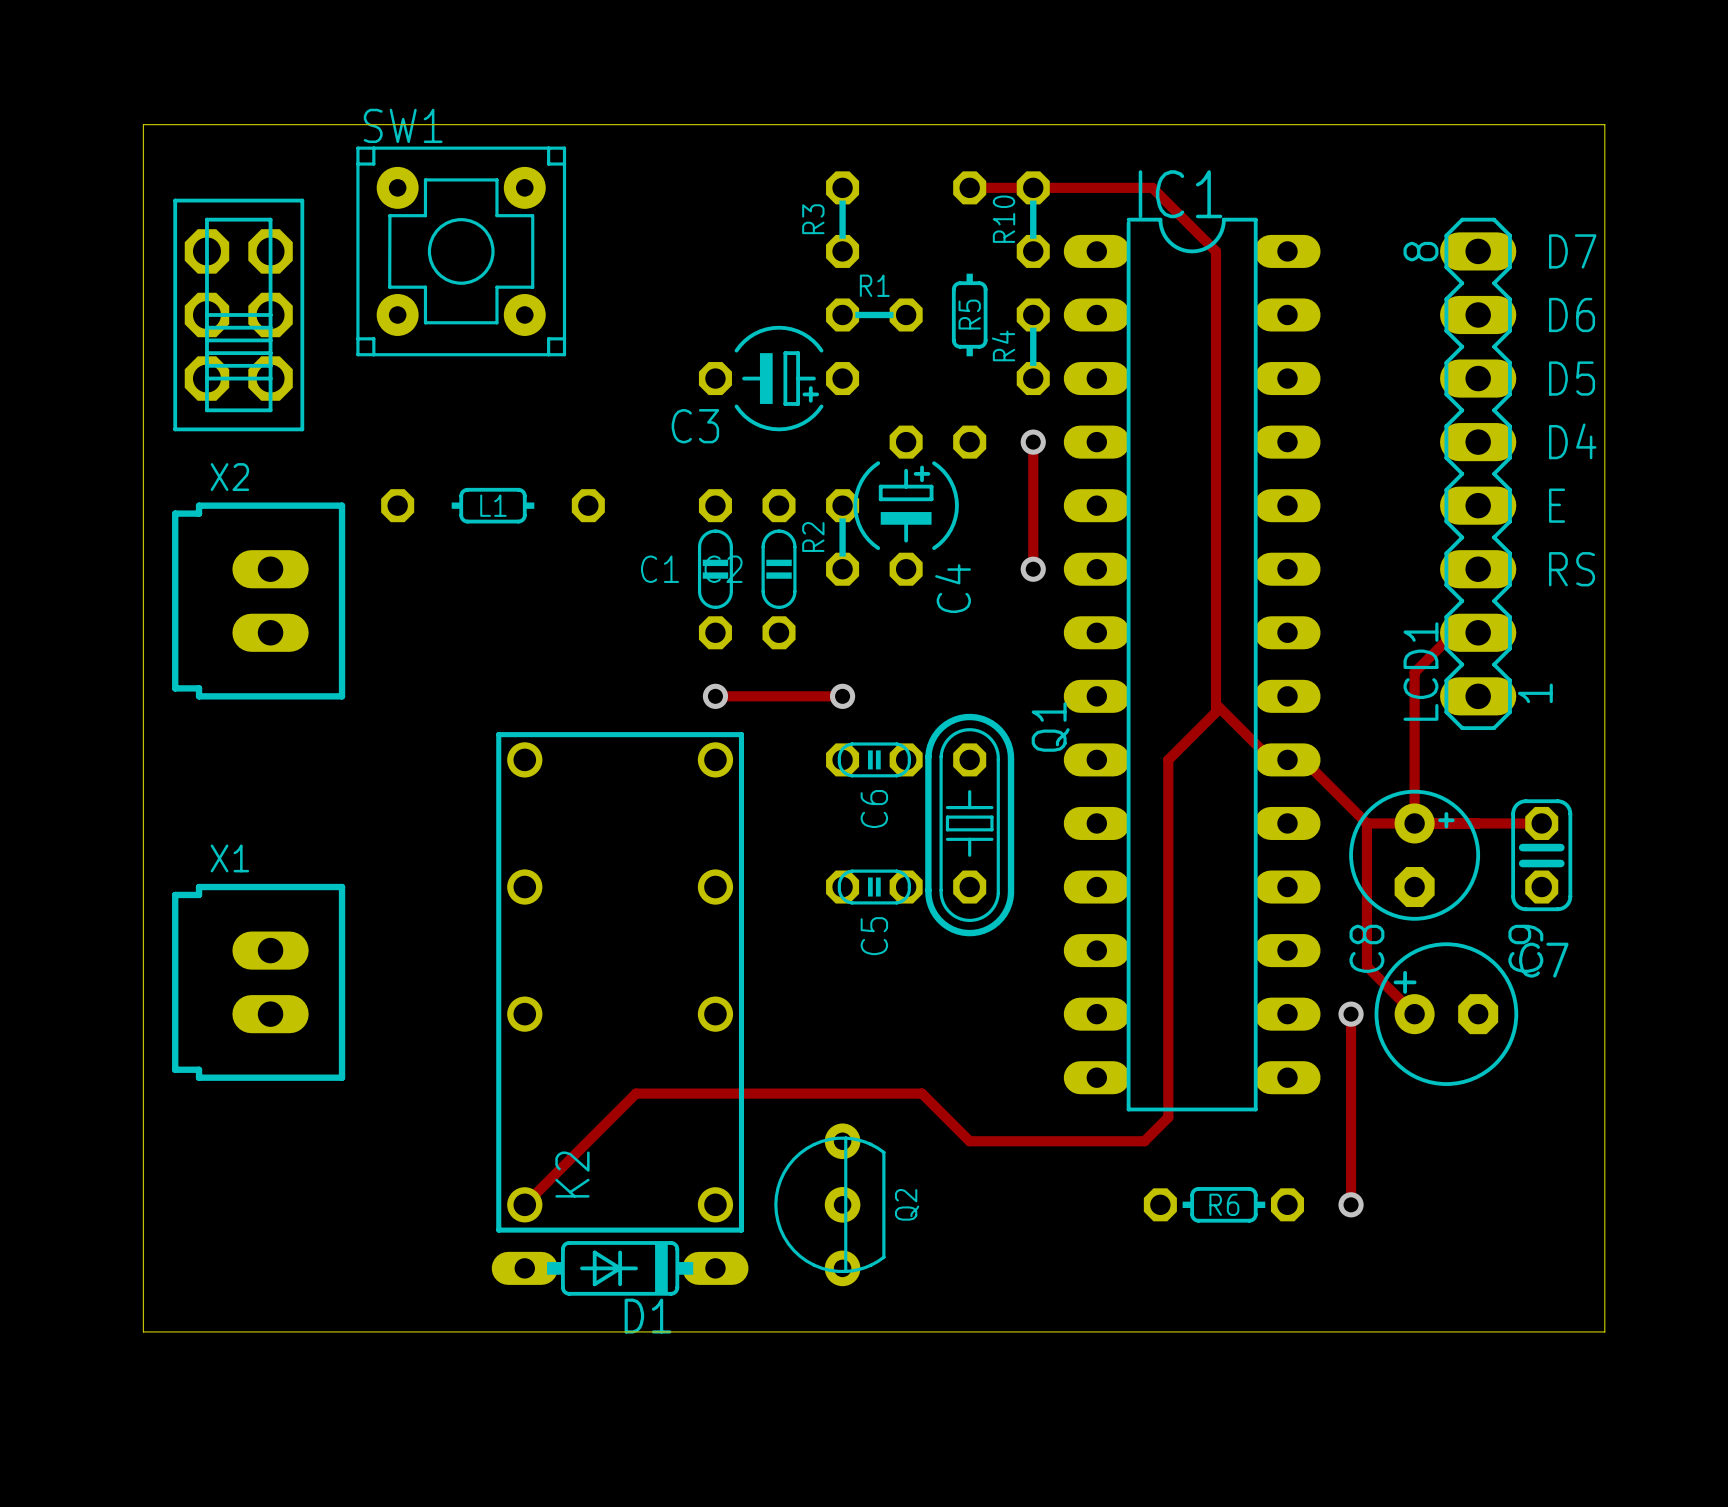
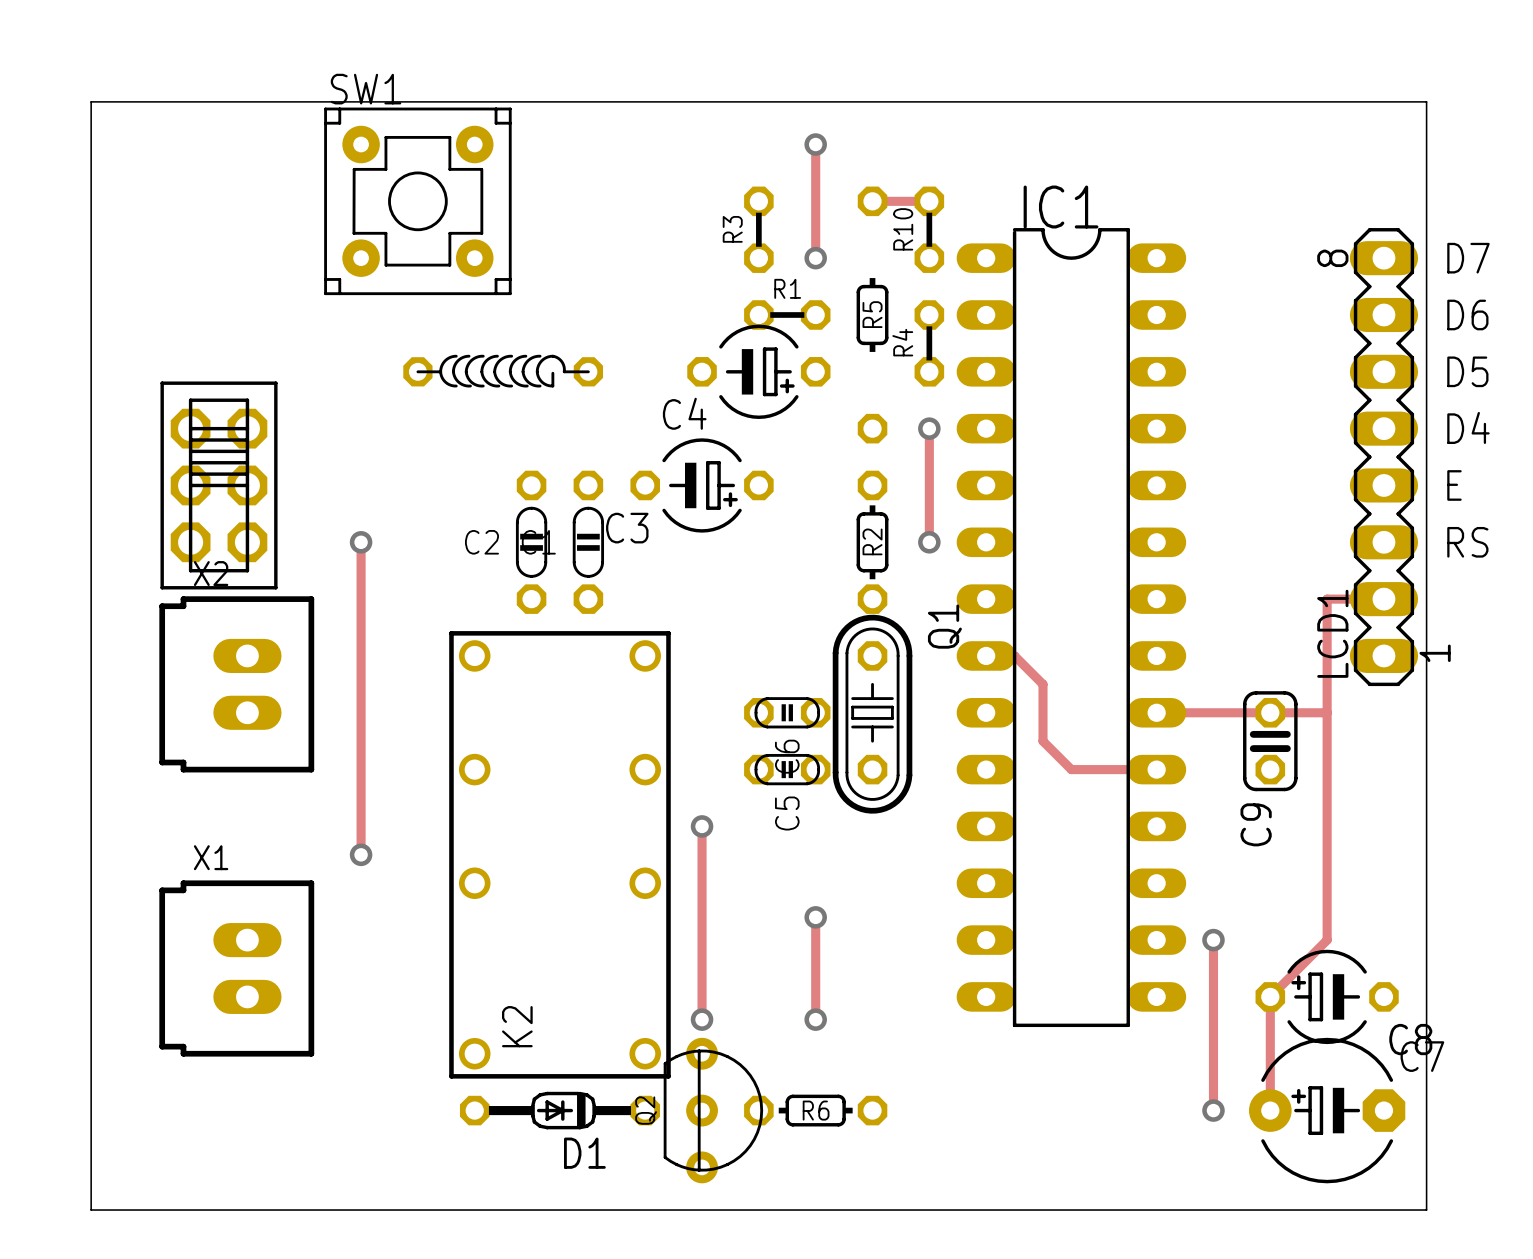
board edge: (143, 124) (1604, 124) (1604, 1331) (143, 1331) (143, 124) -> (91, 101) (91, 1210) (1426, 1210) (1426, 101) (91, 101)
track: none -> (815, 144) (815, 258)
via: none -> (815, 144)
track: (969, 187) (1152, 187) (1215, 251) (1215, 712) (1168, 759) (1168, 1117) (1144, 1141) (969, 1141) (922, 1093) (636, 1093) (524, 1204) -> none
R3 position: (842, 219) -> (758, 229)
R10 position: (1033, 219) -> (929, 229)
track: none -> (872, 201) (929, 201)
text position: D7 (1572, 251) -> D7 (1468, 258)
part rotation: 0° (238, 314) -> 180° (219, 485)
part position: (238, 314) -> (219, 485)
R1 position: (874, 314) -> (787, 314)
via: none -> (815, 258)
R5 position: (969, 314) -> (872, 314)
text position: D6 (1572, 314) -> D6 (1467, 314)
R4 position: (1033, 346) -> (929, 343)
C3 position: (779, 378) -> (702, 485)
text position: D5 (1572, 378) -> D5 (1467, 371)
part: none -> (503, 371)
text position: D4 (1572, 441) -> D4 (1468, 427)
track: (1033, 442) (1033, 505) -> (929, 485) (929, 542)
via: (1033, 442) -> none
LCD1 position: (1478, 473) -> (1383, 457)
R2 footprint: [826, 489, 860, 586] -> [856, 470, 889, 614]
L1: (493, 505) -> none
C4 rotation: 0° (906, 505) -> 90° clockwise (758, 371)
via: none -> (929, 428)
text position: E (1557, 505) -> E (1454, 485)
C1 position: (715, 569) -> (588, 542)
C2 position: (779, 569) -> (531, 542)
via: (1033, 569) -> none
text position: RS (1572, 569) -> RS (1467, 542)
X2 position: (258, 601) -> (236, 684)
track: none -> (361, 542) (361, 854)
via: none -> (361, 542)
via: none -> (929, 542)
track: (1478, 632) (1454, 632) (1414, 672) (1414, 823) -> none
IC1 position: (1192, 664) -> (1071, 627)
track: (715, 696) (842, 696) -> none
via: (715, 696) -> none
via: (842, 696) -> none
track: none -> (1383, 599) (1327, 599) (1327, 940) (1270, 996) (1270, 1110)
track: (1215, 704) (1271, 759) -> none
C6 position: (874, 759) -> (787, 712)
track: none -> (986, 655) (1014, 655) (1043, 684) (1043, 741) (1071, 769) (1156, 769)
track: (1303, 759) (1366, 823) (1366, 966) (1414, 1014) -> none
C8 footprint: [1349, 789, 1481, 921] -> [1255, 949, 1399, 1045]
track: (1478, 823) (1541, 823) -> (1170, 712) (1227, 712)
C9 position: (1541, 855) -> (1270, 741)
C7 footprint: [1374, 942, 1519, 1086] -> [1249, 1037, 1406, 1184]
C8 name position: C8 (1366, 948) -> C8 (1410, 1039)
track: none -> (702, 826) (702, 1019)
via: none -> (702, 826)
X1 position: (258, 982) -> (236, 968)
via: none -> (361, 854)
track: (1351, 1014) (1351, 1077) -> (1213, 1053) (1213, 1110)
via: (1351, 1014) -> none
track: none -> (815, 917) (815, 1019)
via: none -> (815, 917)
via: none -> (1213, 940)
via: none -> (702, 1019)
via: none -> (815, 1019)
Q2 rotation: 0° (829, 1204) -> 180° (713, 1110)
R6 position: (1223, 1204) -> (815, 1110)
via: (1351, 1204) -> none
D1 footprint: [491, 1241, 749, 1296] -> [459, 1091, 660, 1130]
via: none -> (1213, 1110)

